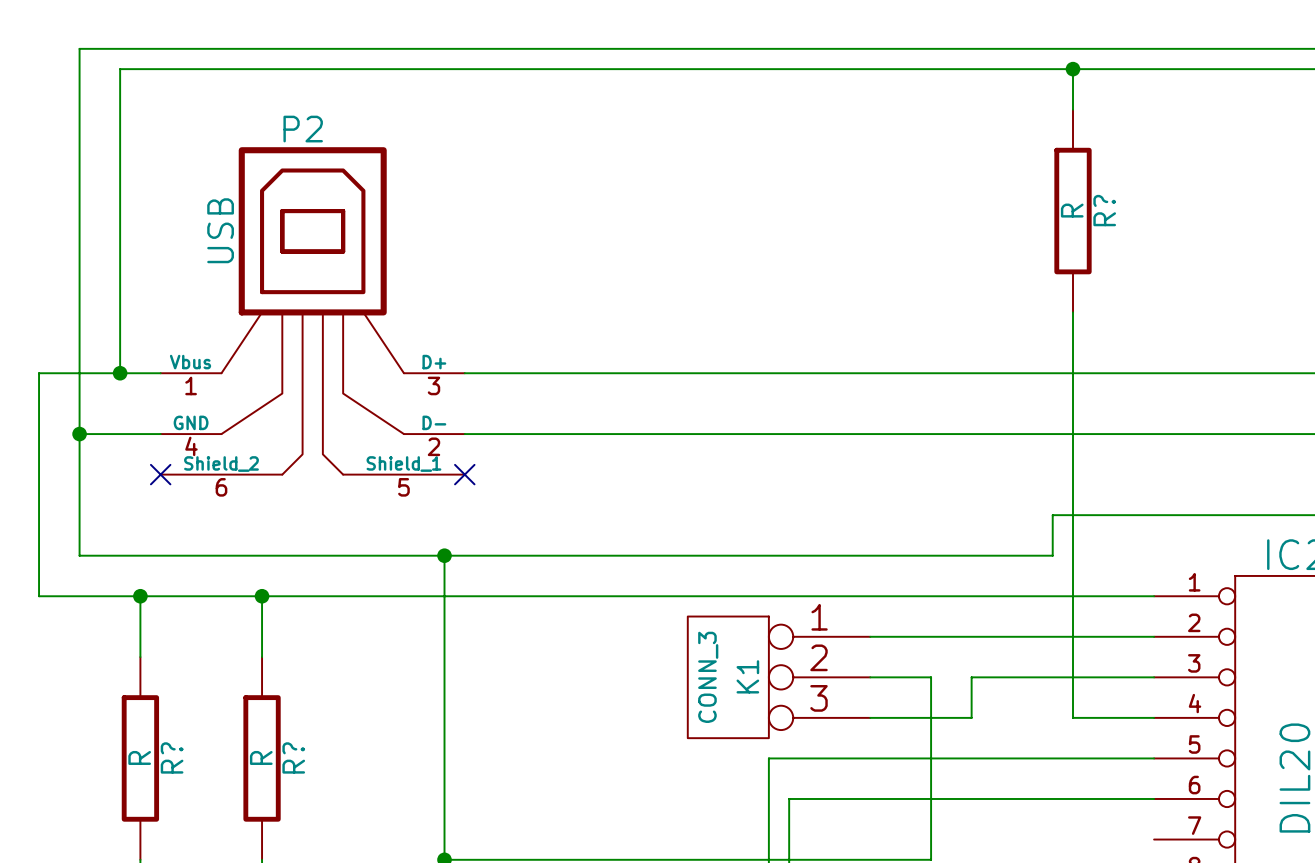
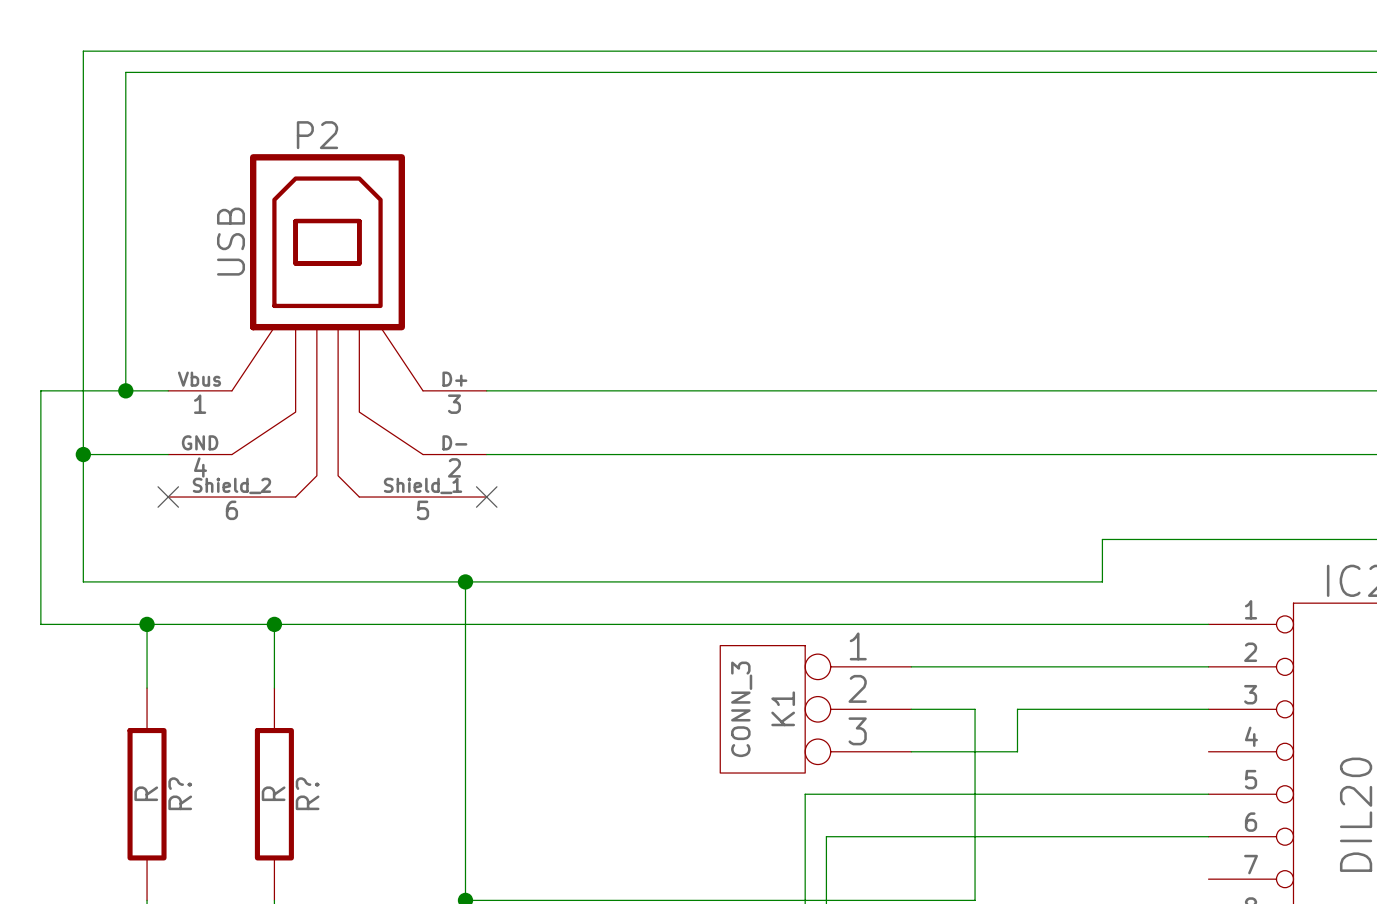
wire: (1073, 69) (1073, 109) -> none
junction: (1073, 69) -> none
R?: R (1073, 211) -> none
wire: (1073, 312) (1073, 717) (1154, 717) -> none

